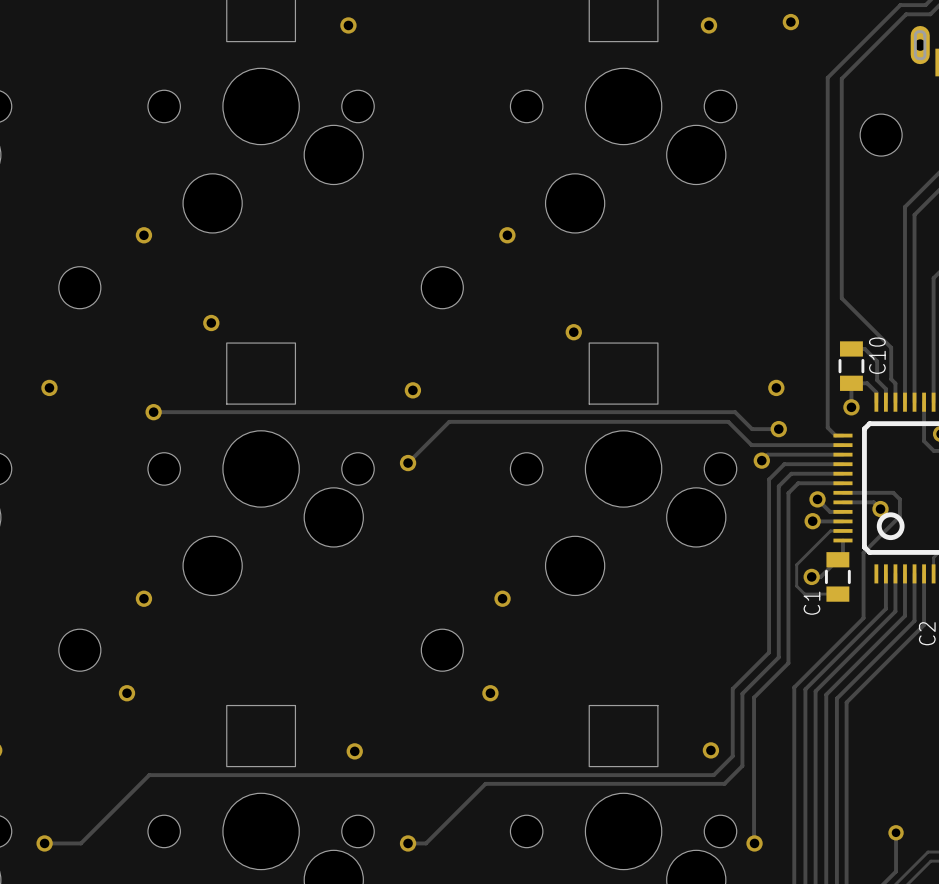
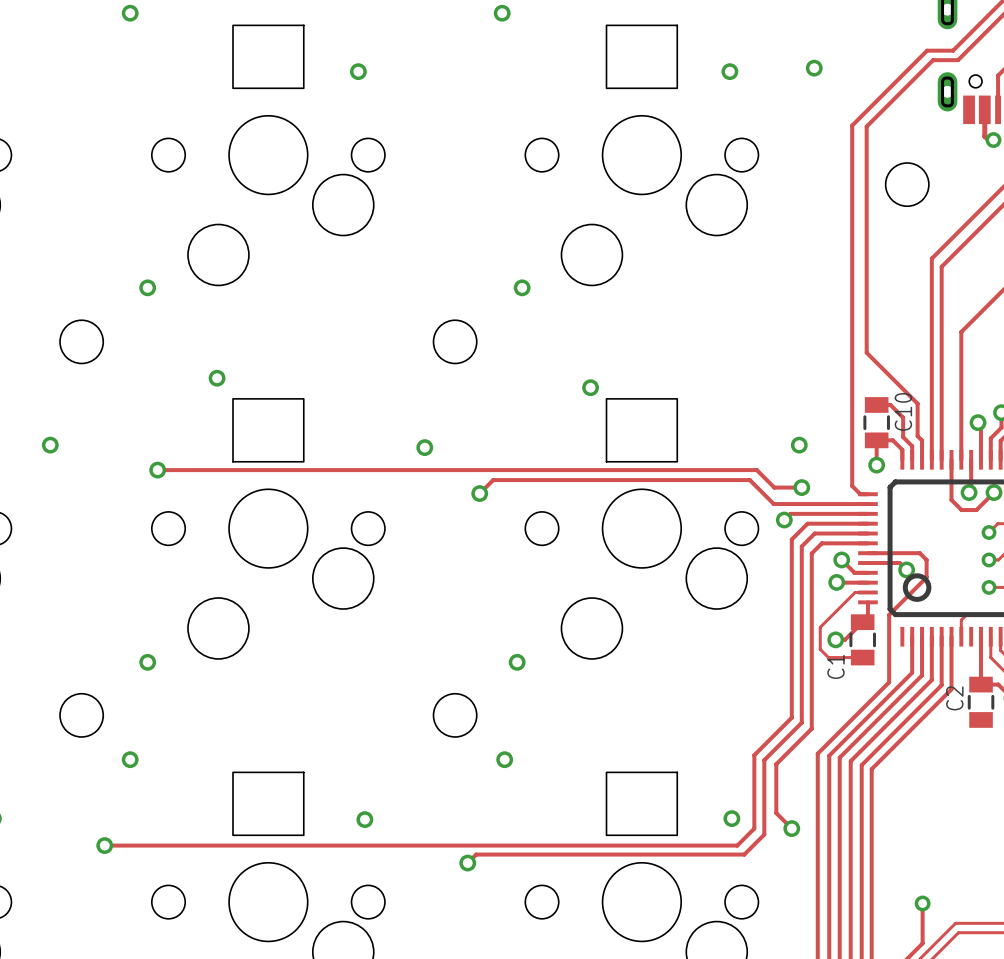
track: (479, 421) (449, 421) (408, 463) -> (493, 480) (479, 493)
via position: (408, 463) -> (479, 493)
track: (754, 745) (754, 843) -> (776, 813) (791, 828)
track: (732, 756) (713, 775) (149, 775) (80, 843) (44, 843) -> (754, 824) (754, 828) (737, 845) (104, 845)
track: (724, 783) (485, 783) (425, 843) (408, 843) -> (745, 853) (476, 854) (467, 863)
via position: (44, 843) -> (104, 845)
via position: (408, 843) -> (467, 863)
via position: (754, 843) -> (791, 828)

